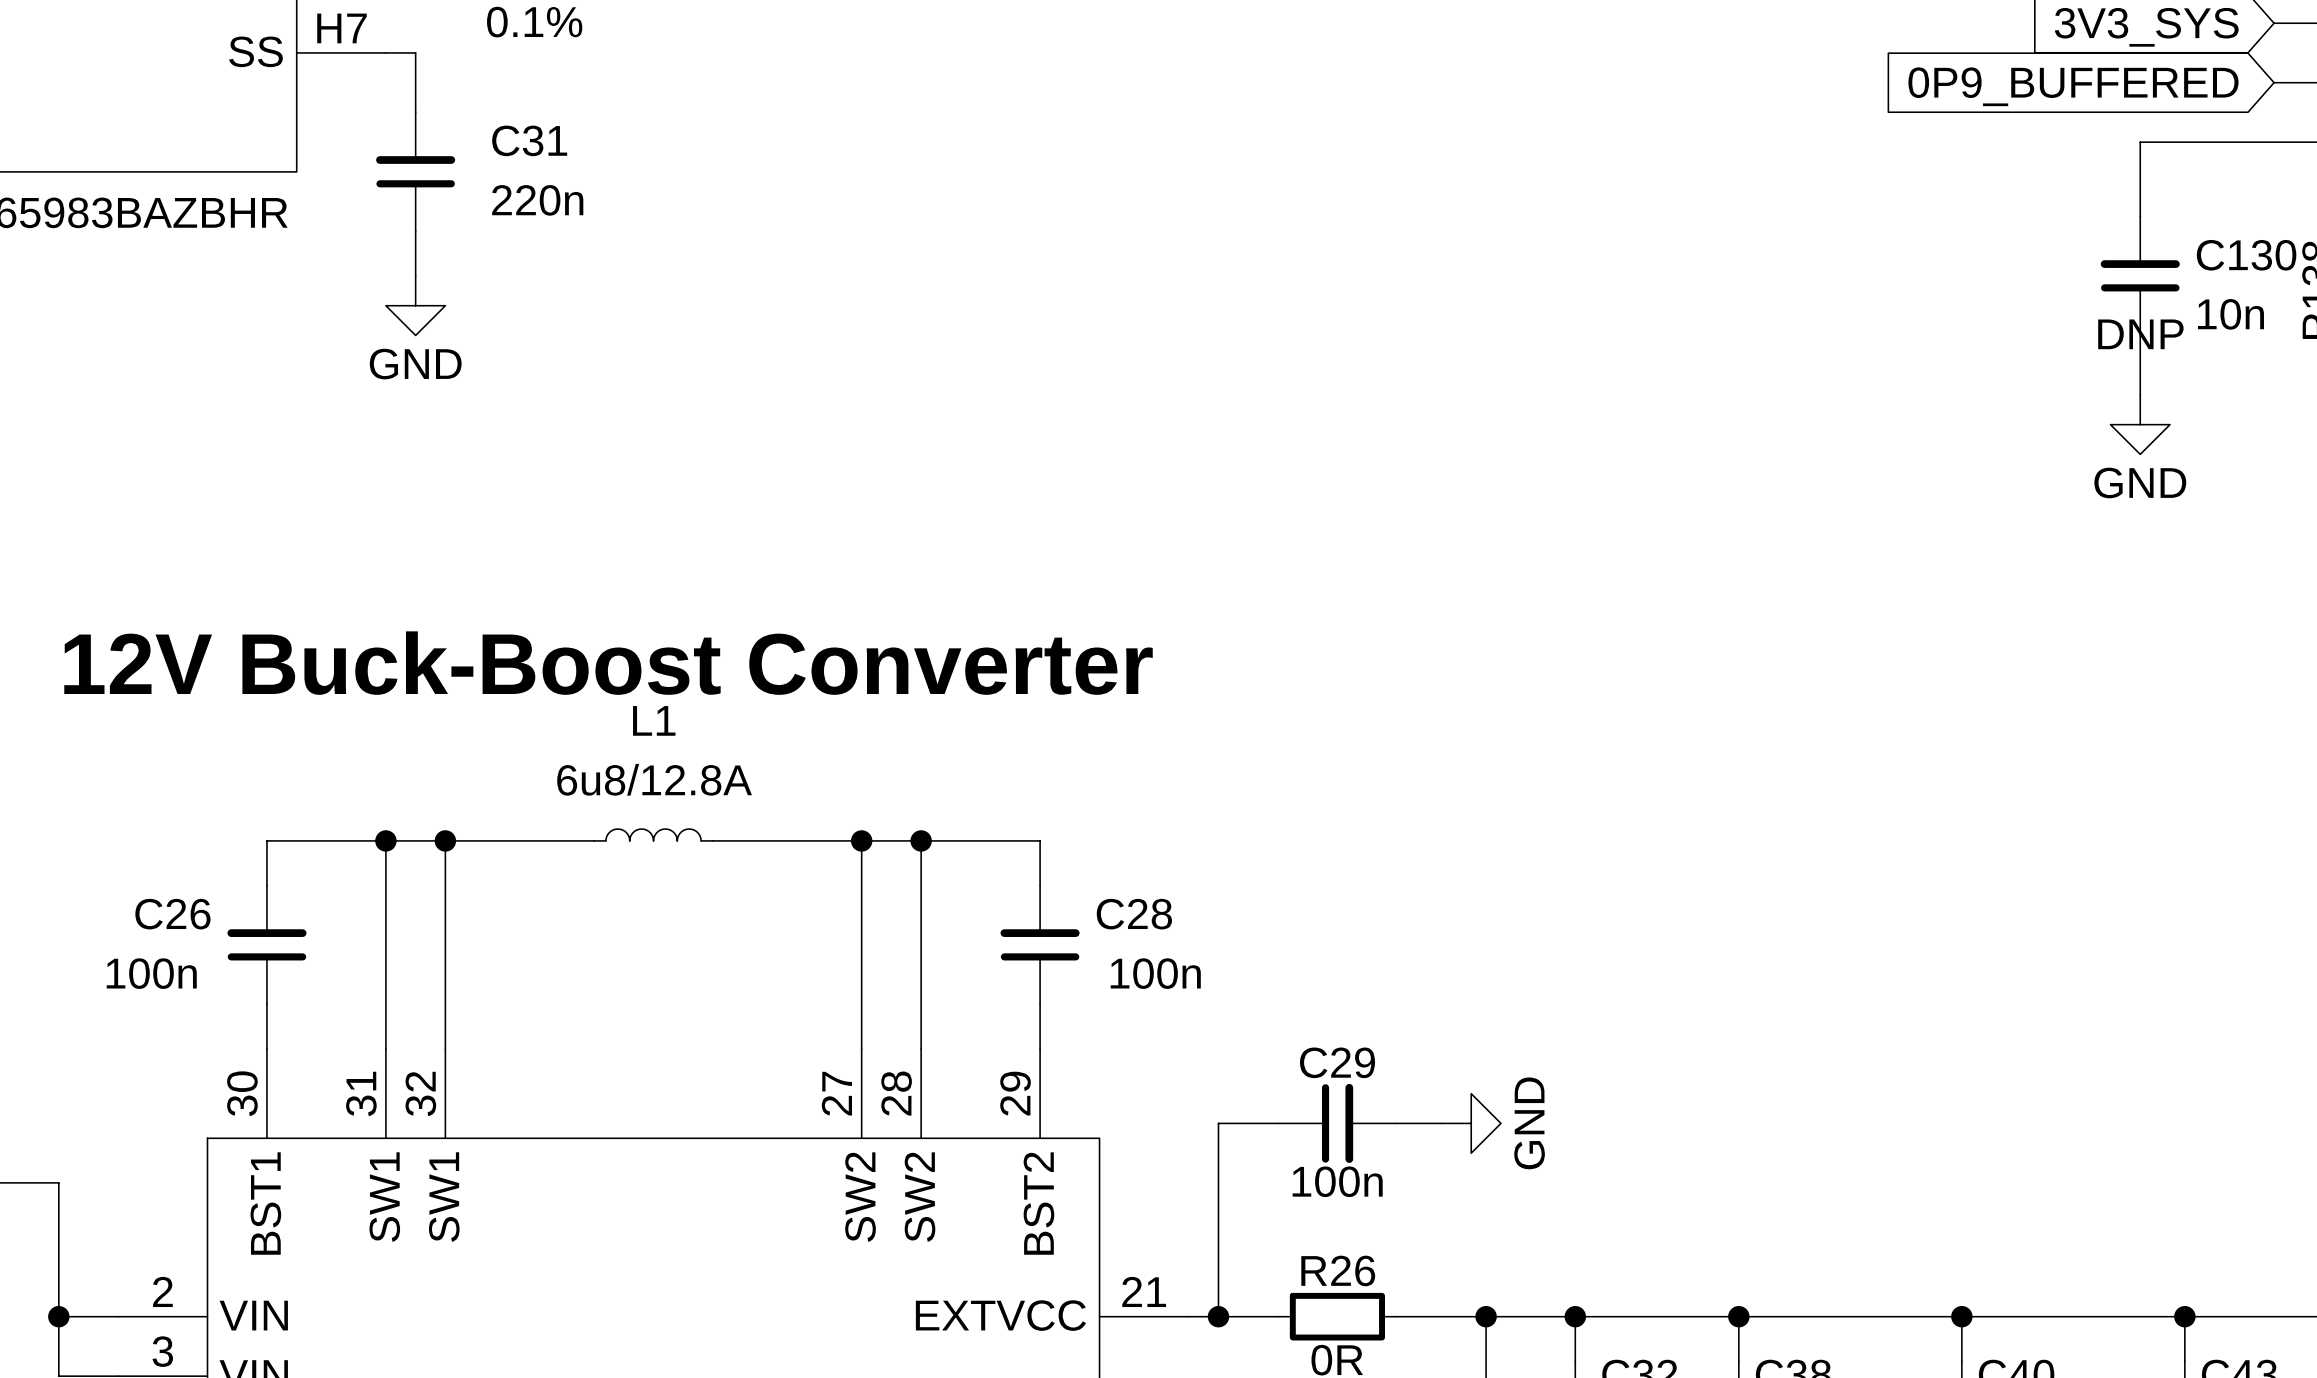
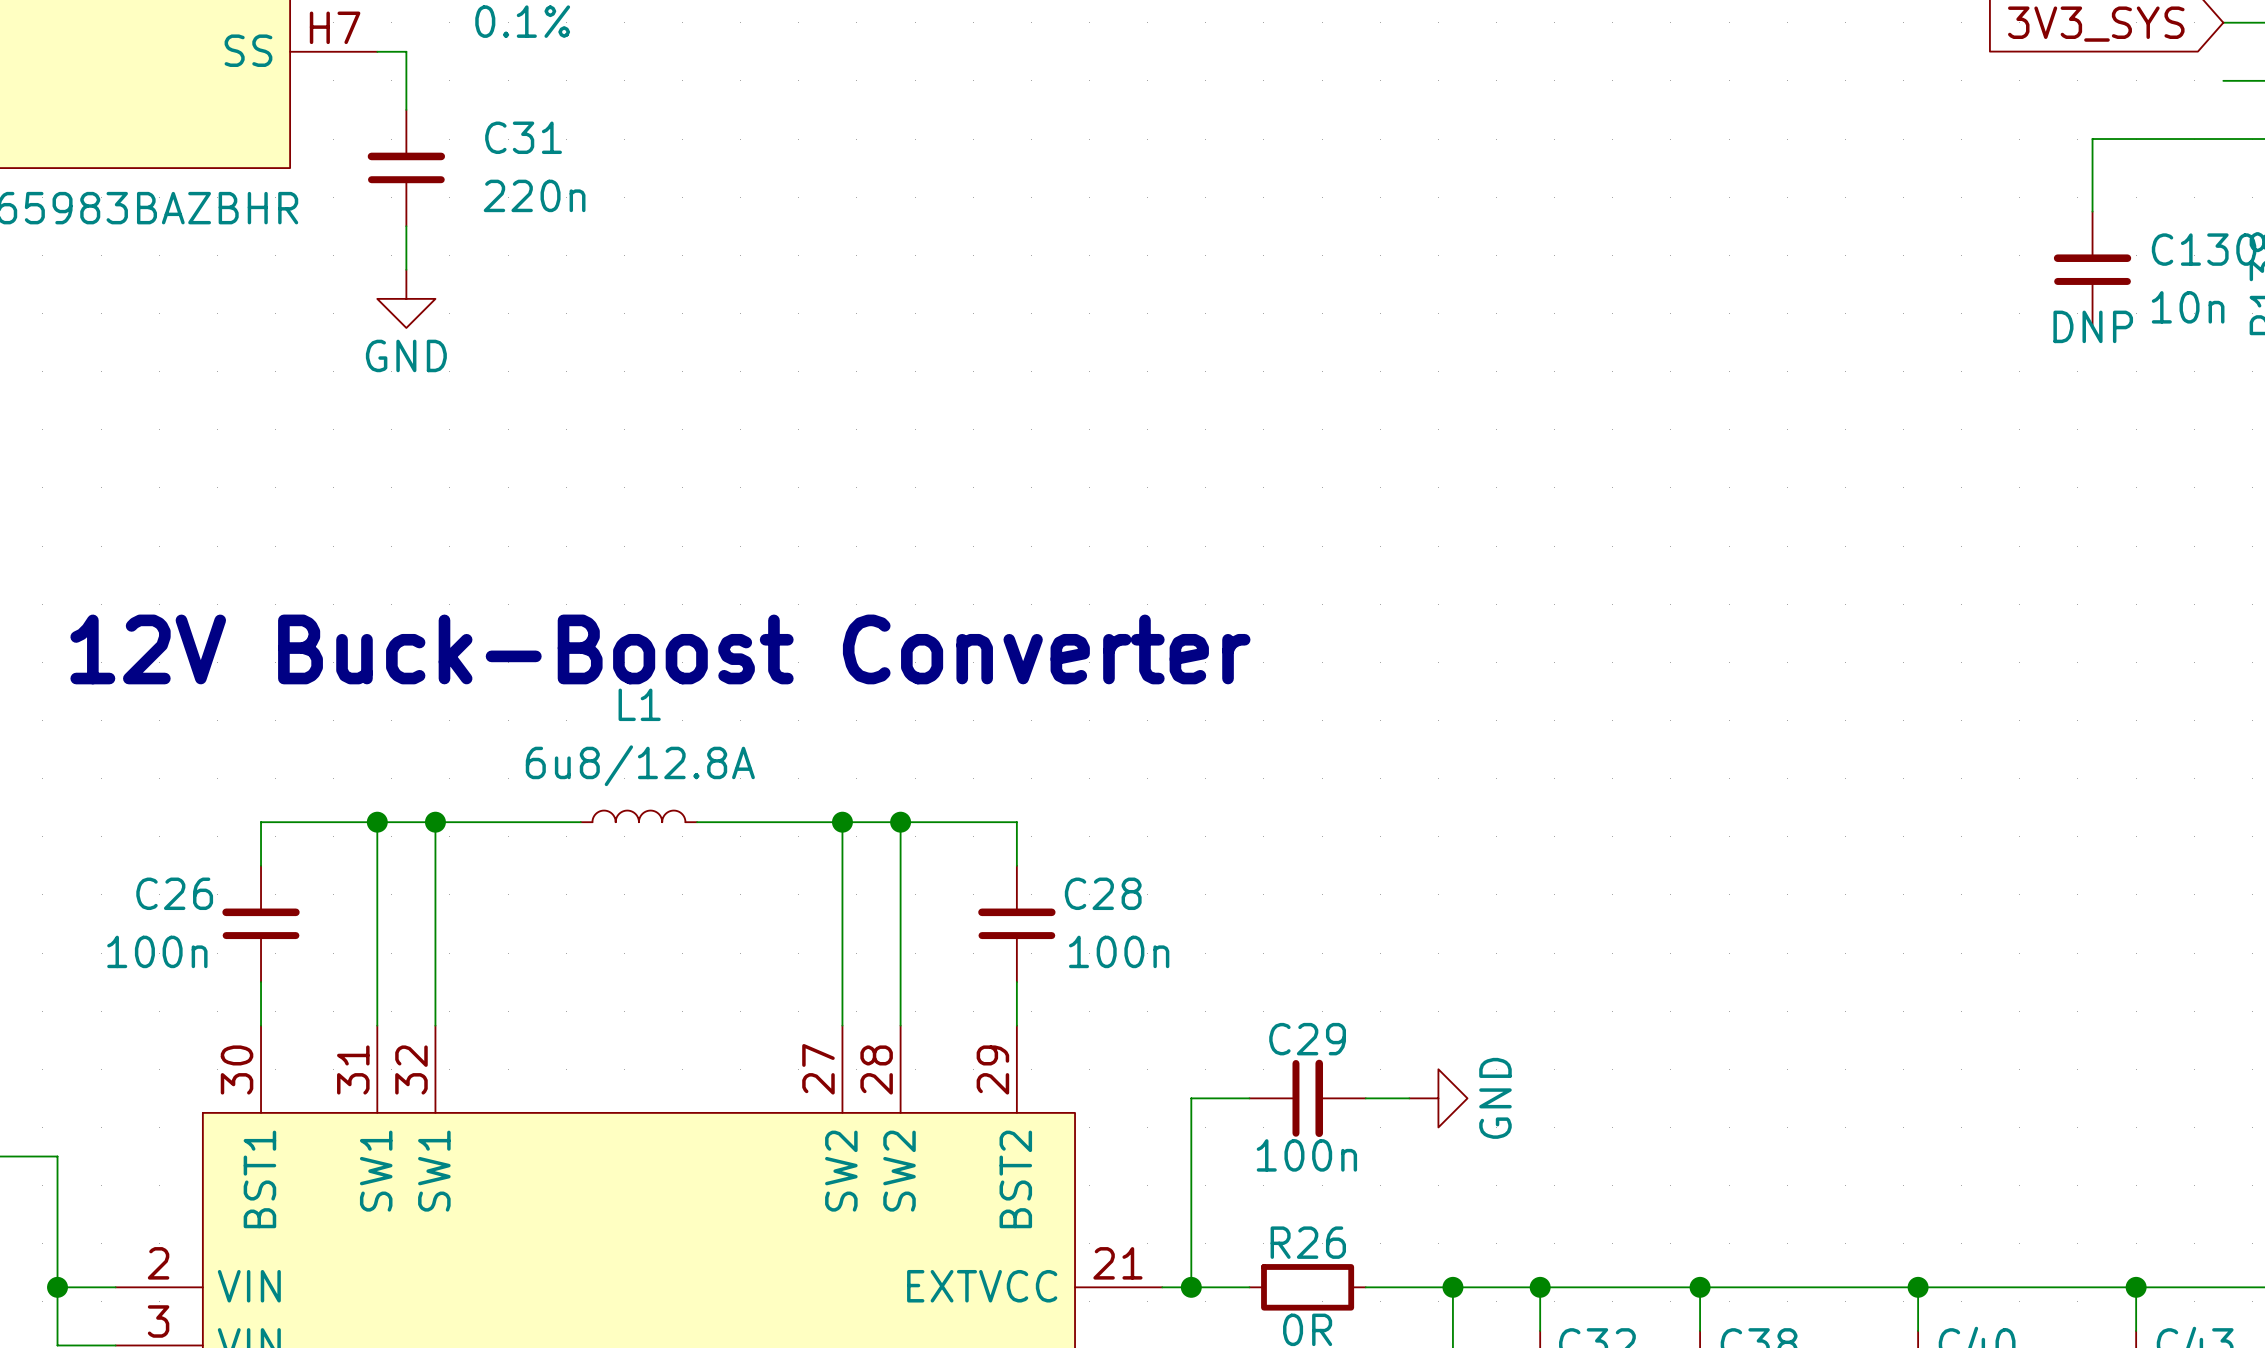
global label: 0P9_BUFFERED (2073, 86) -> none
wire: (2140, 335) (2140, 394) -> none
power symbol: GND (2140, 424) -> none

